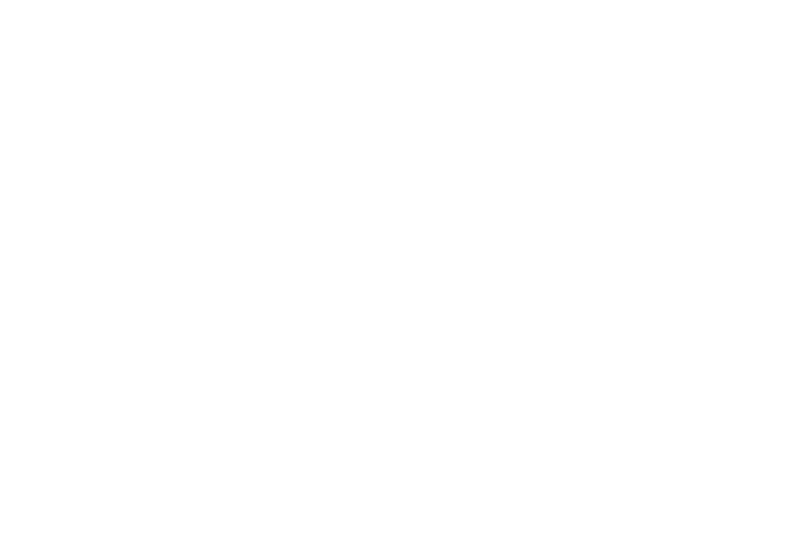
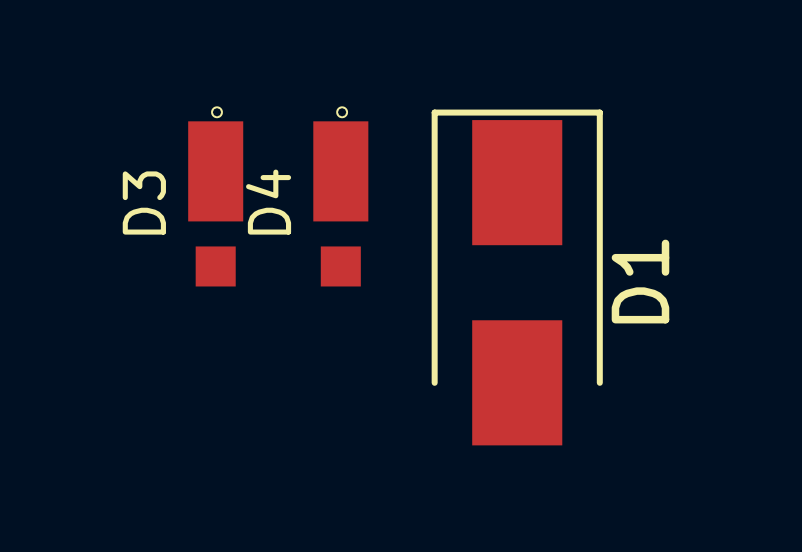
D3: none -> (215, 196)
D4: none -> (340, 196)
D1: none -> (517, 277)

